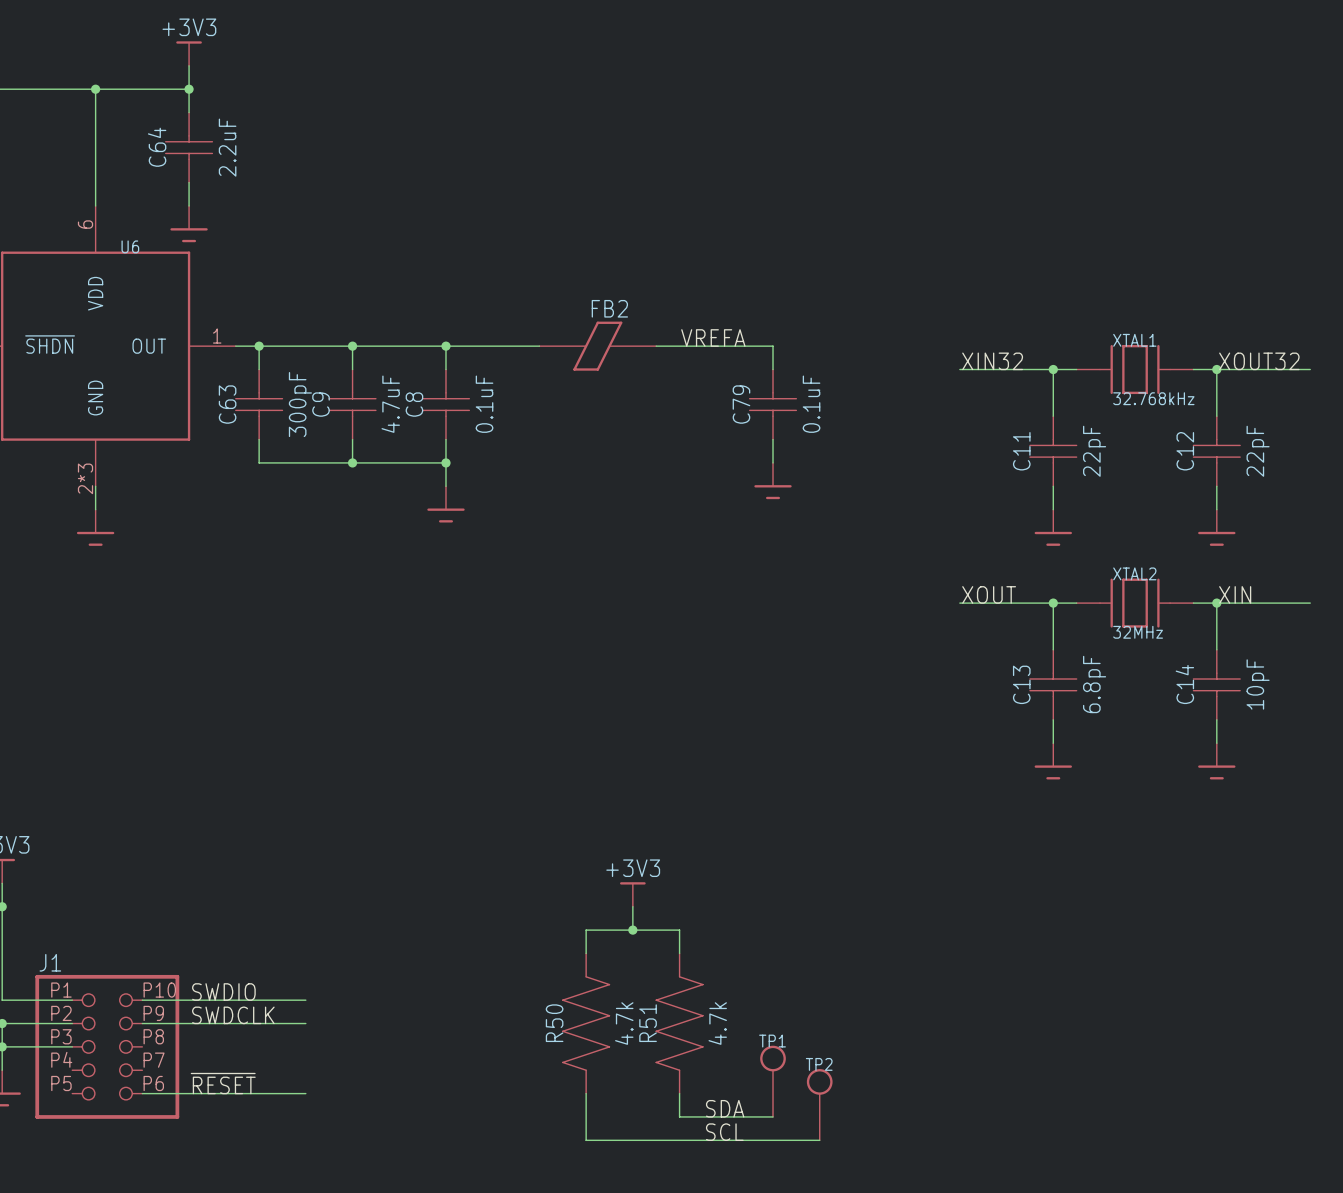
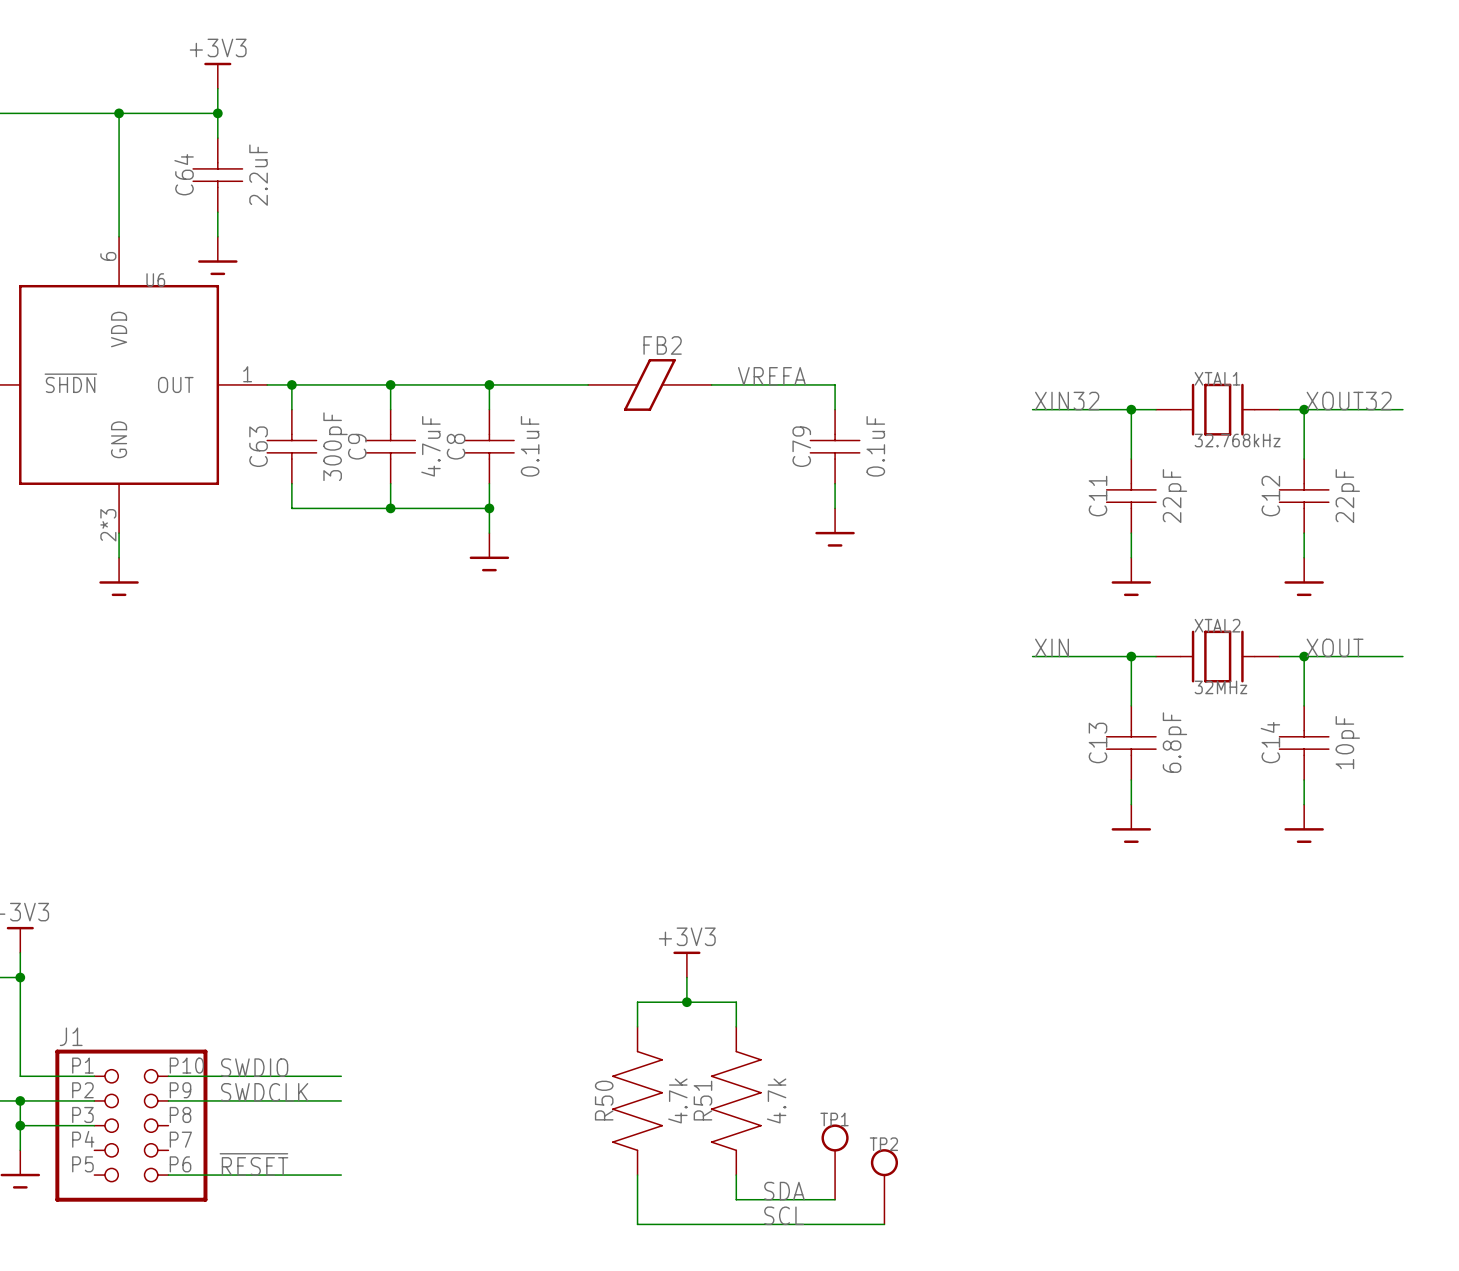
label: XOUT (989, 594) -> XIN (1052, 647)
label: XIN (1235, 594) -> XOUT (1335, 647)

